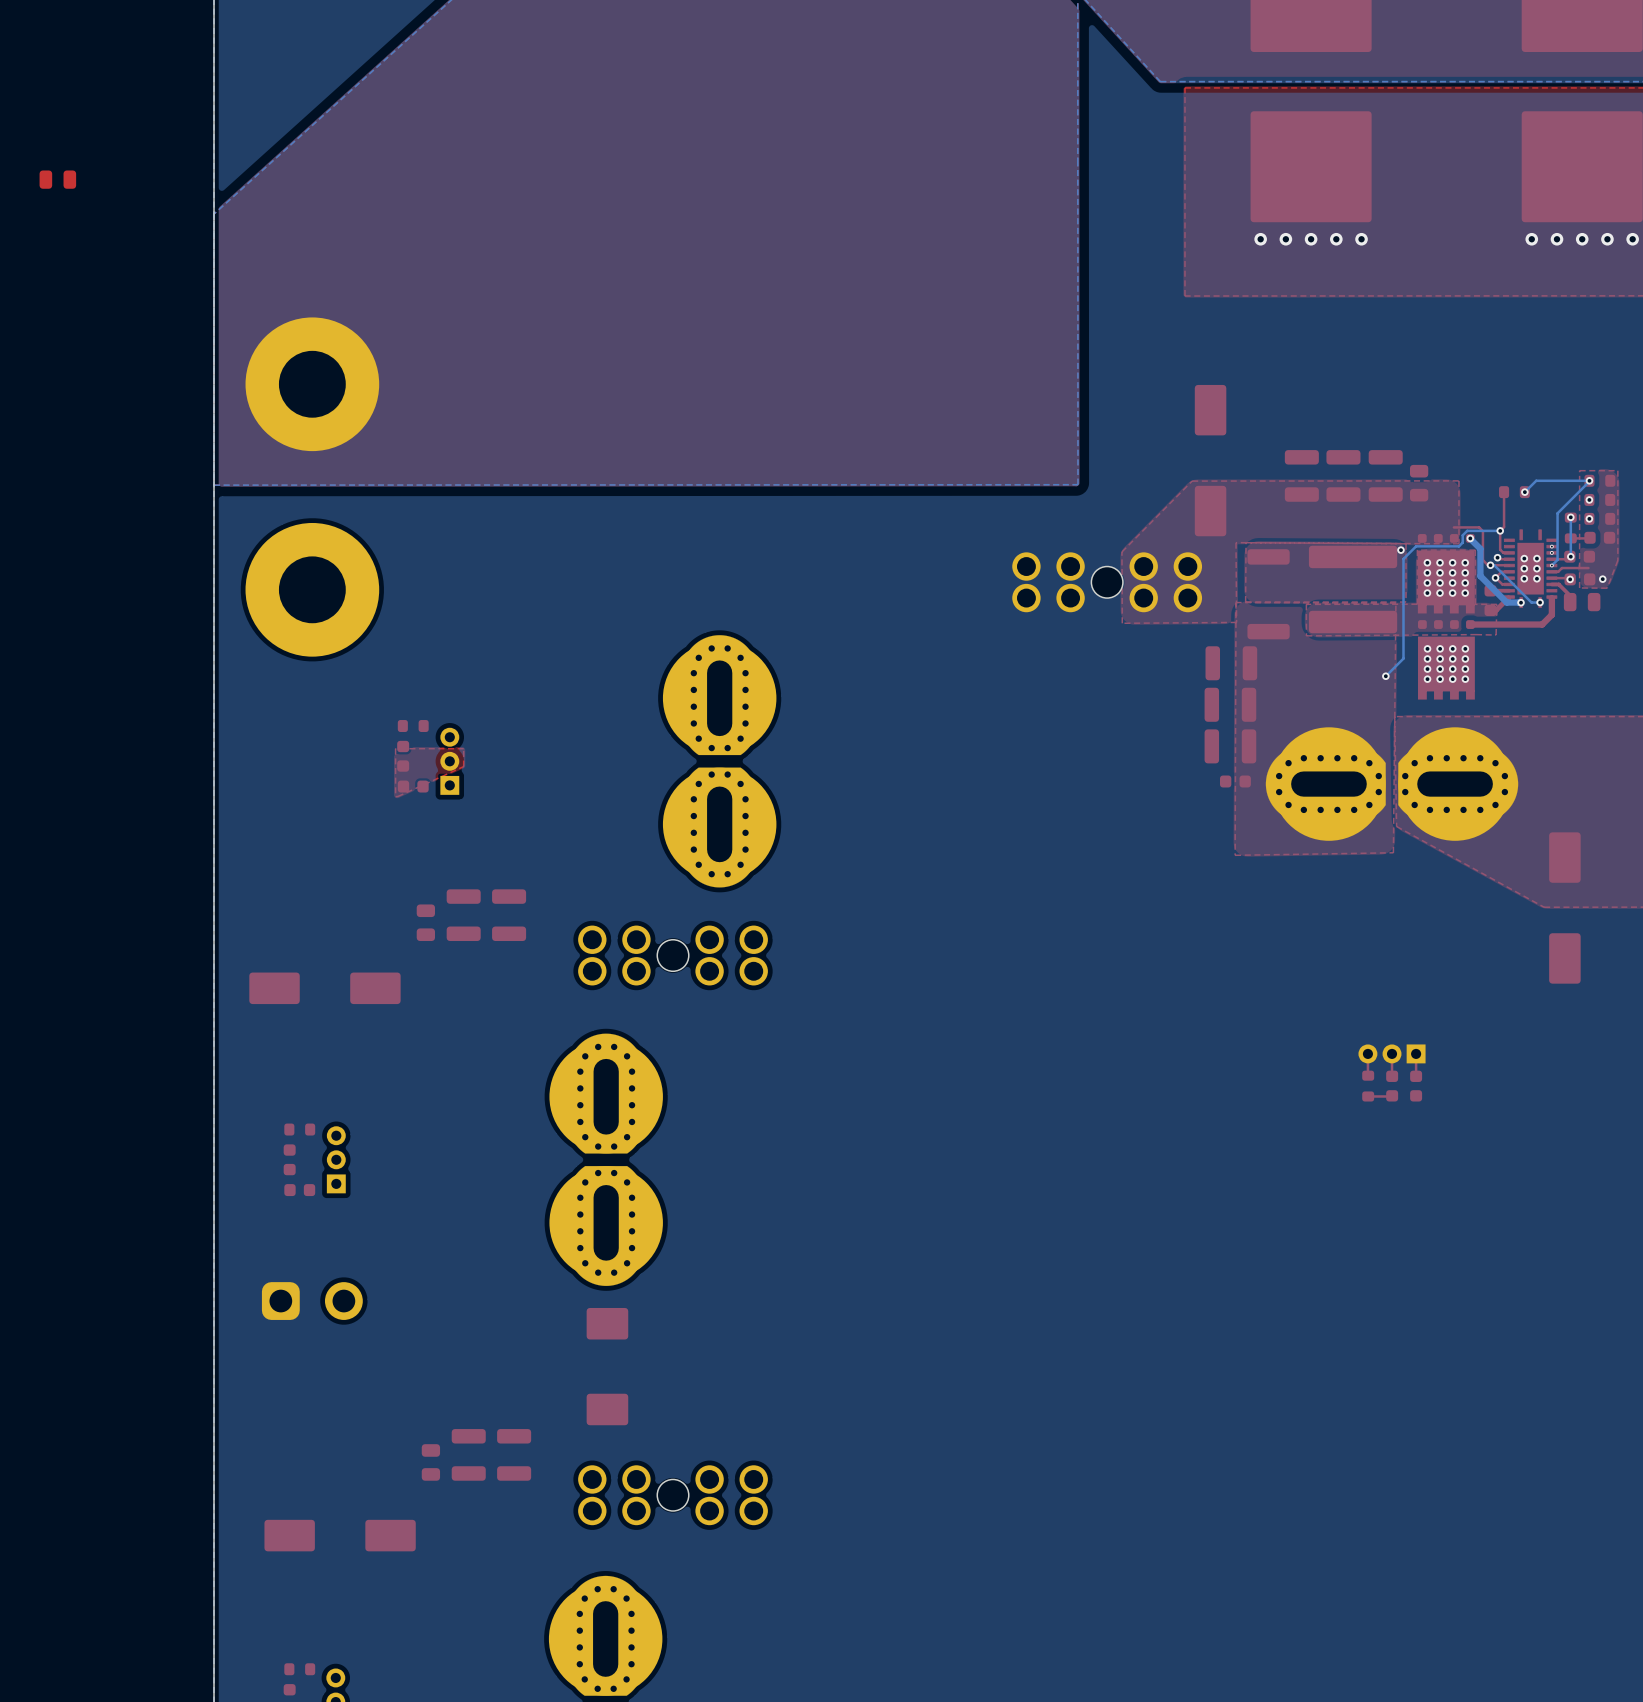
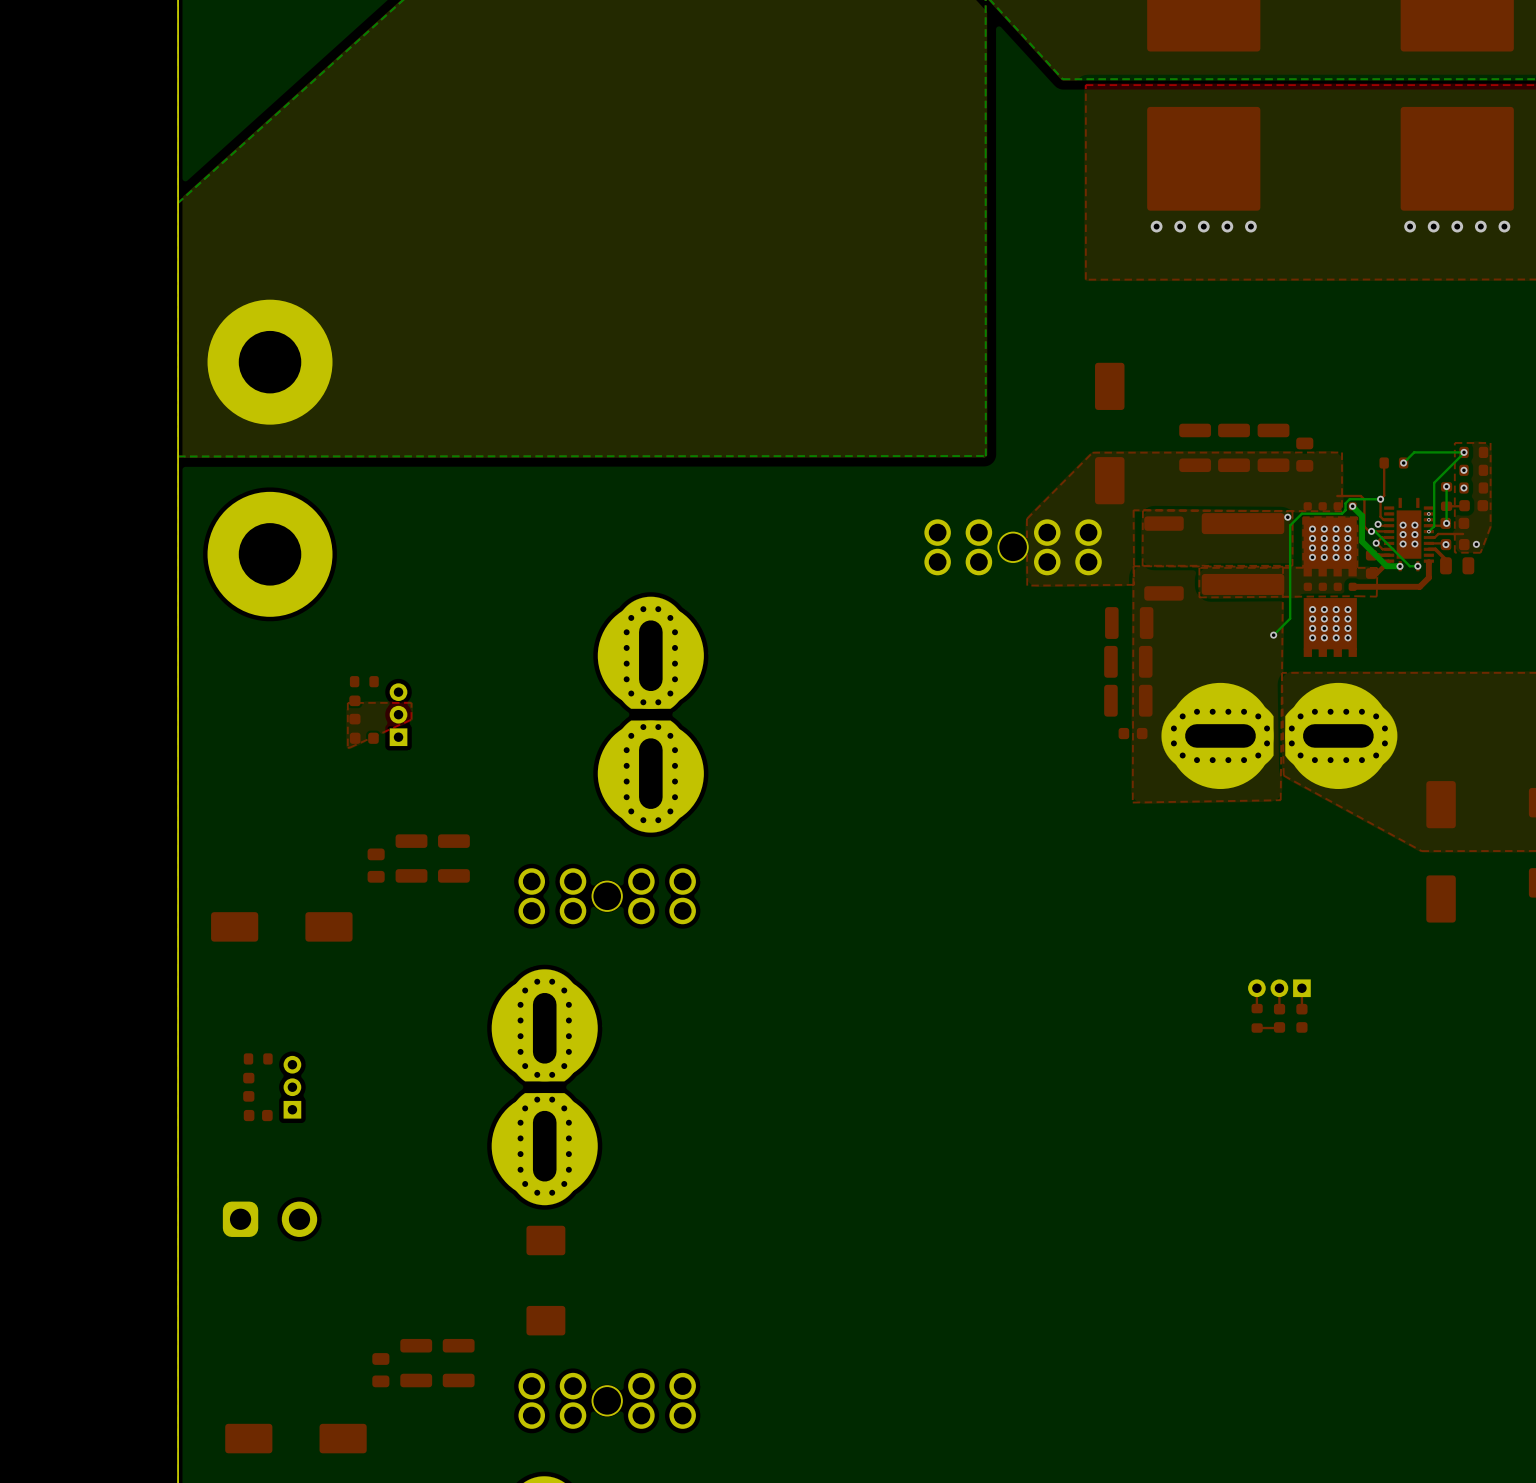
part: (57, 179) -> none

